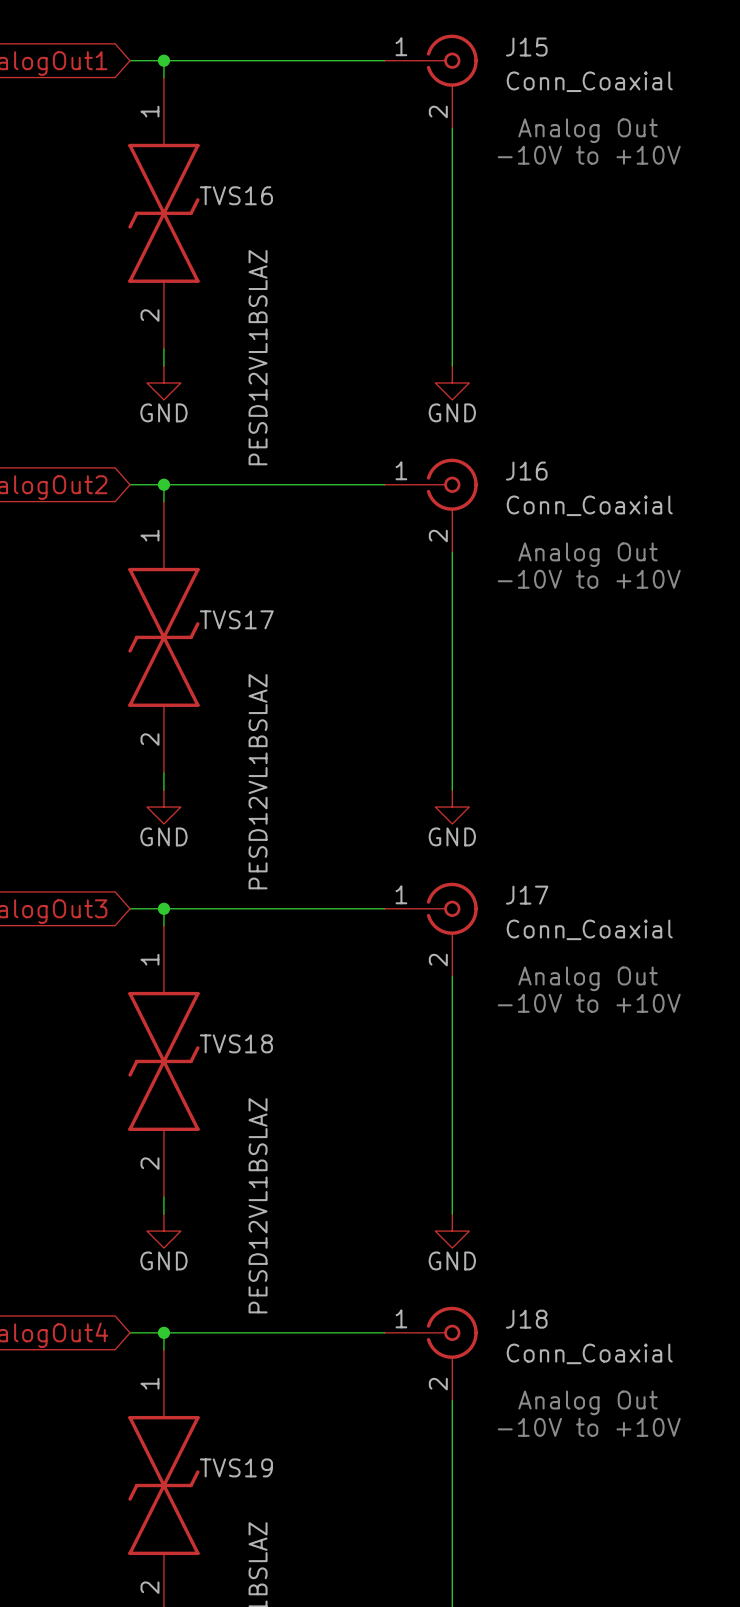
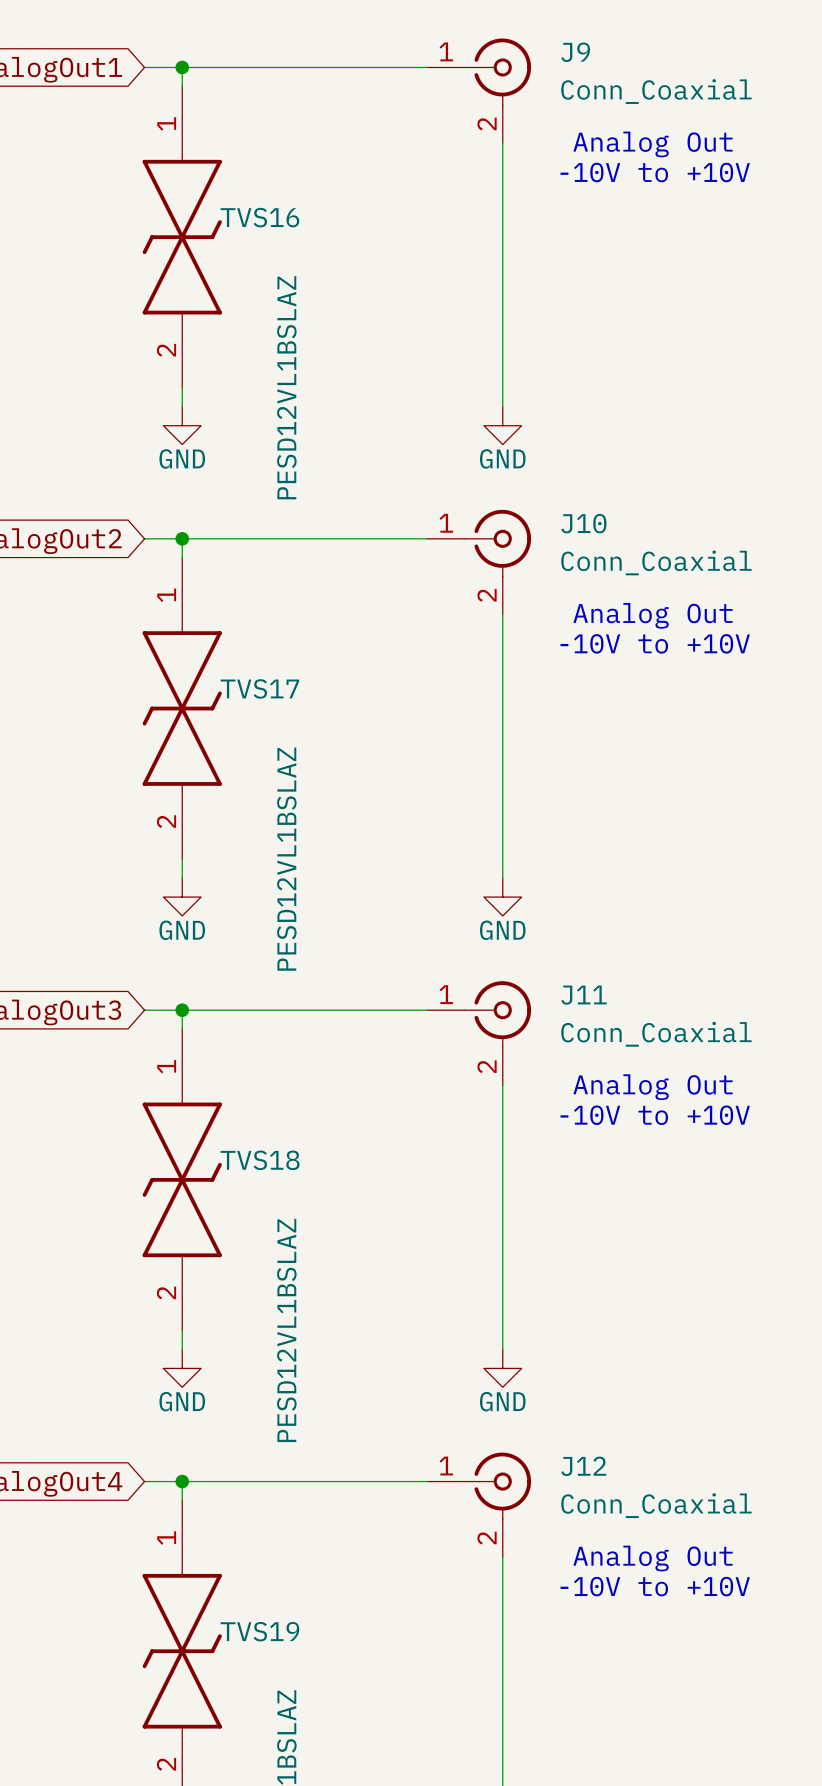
J15 name: J15 (526, 47) -> J9 (575, 52)
J16 name: J16 (526, 471) -> J10 (583, 523)
J17 name: J17 (527, 895) -> J11 (584, 995)
J18 name: J18 (526, 1319) -> J12 (583, 1466)

